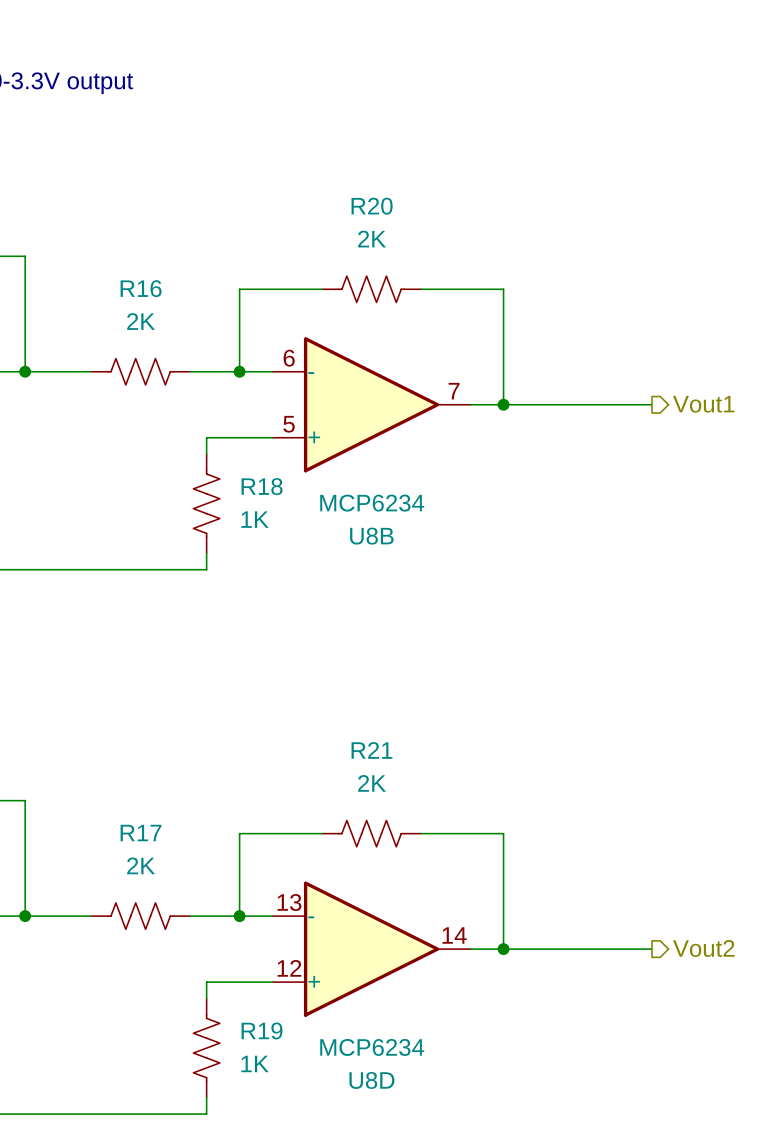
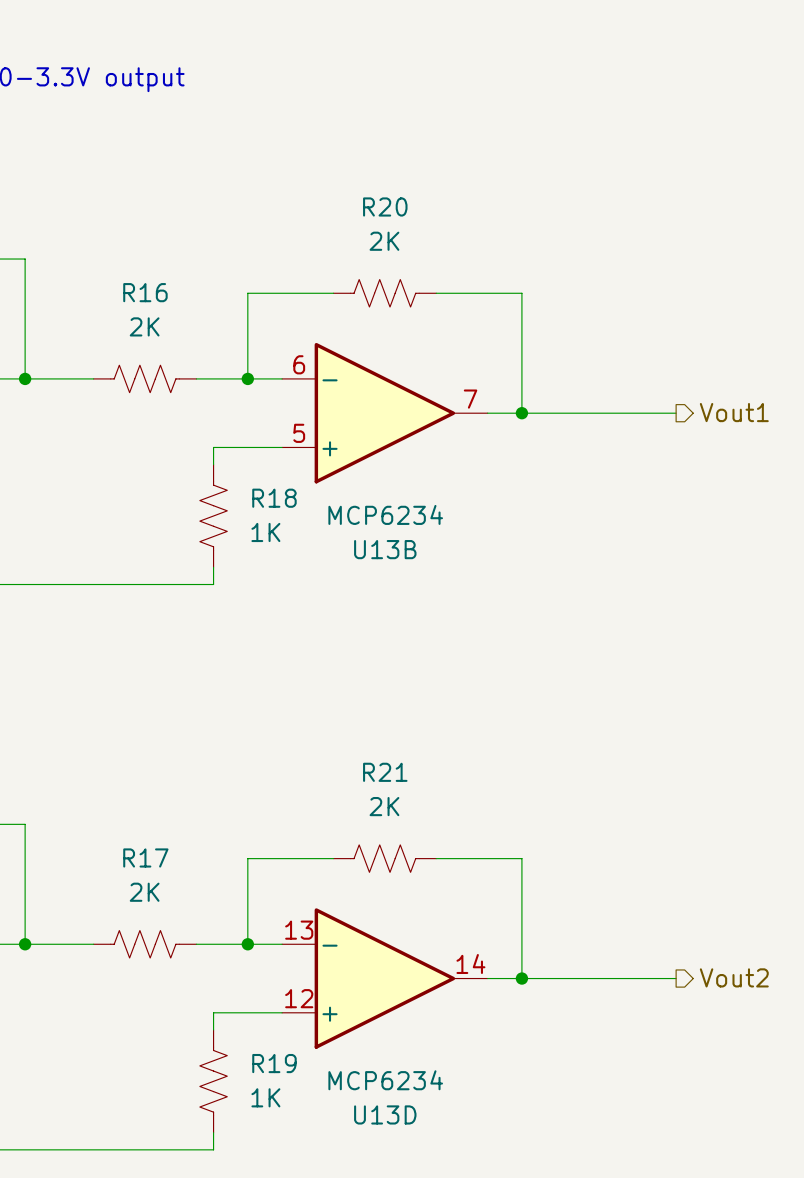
U8B name: U8B (371, 536) -> U13B (385, 549)
U8D name: U8D (371, 1080) -> U13D (385, 1114)

